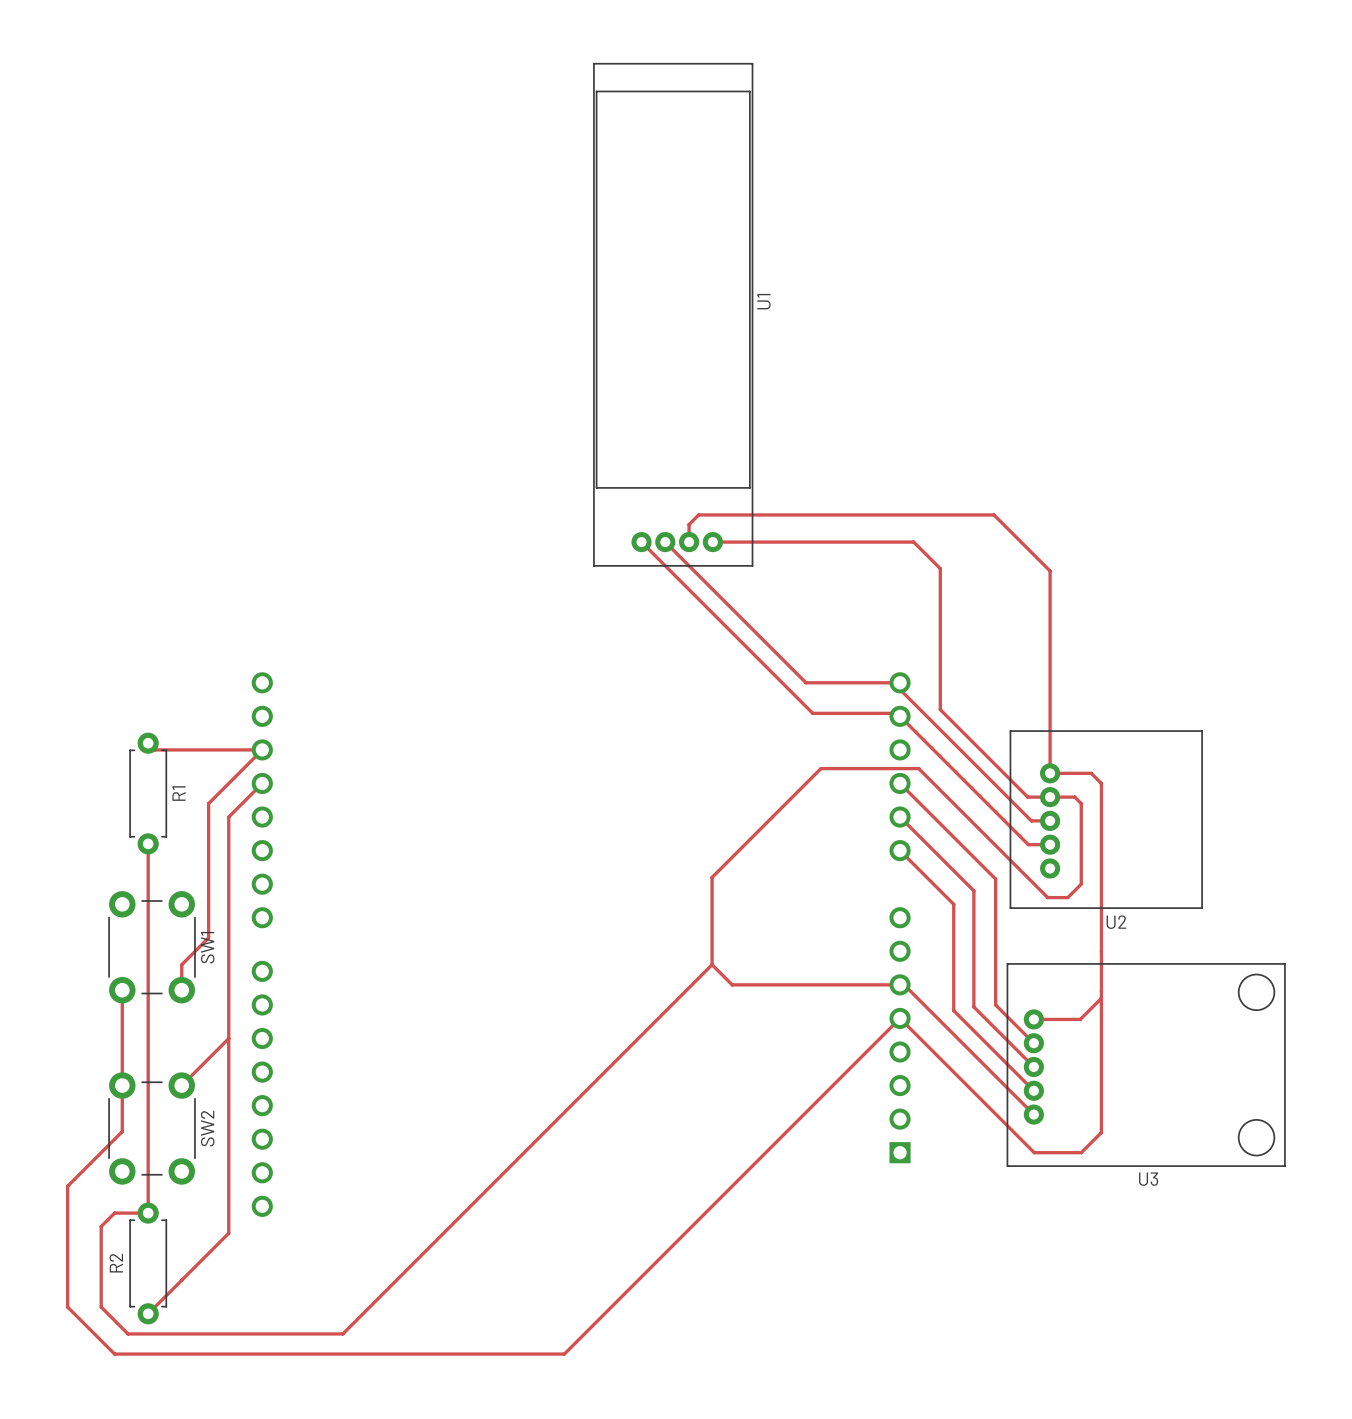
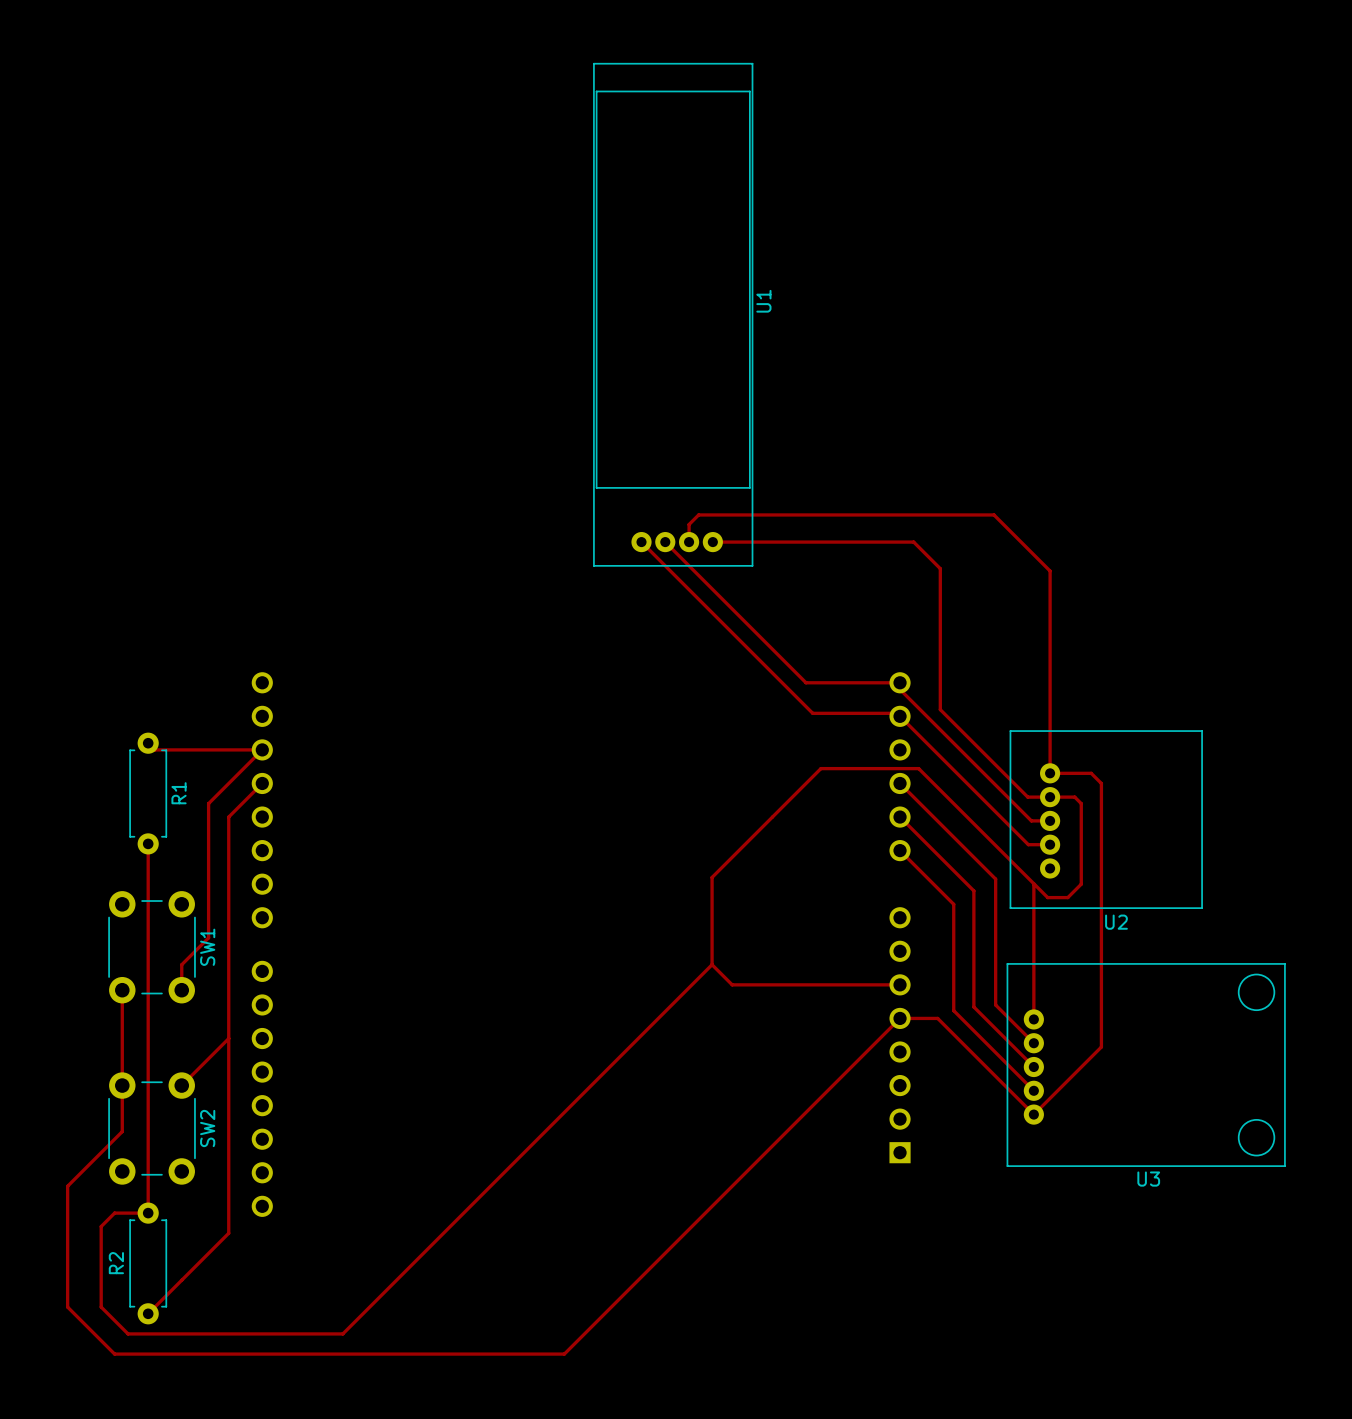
top track: (900, 984) (904, 984) (937, 1018) -> (900, 1018) (937, 1018)
top track: (1101, 998) (1080, 1019) (1033, 1019) -> (1034, 884) (1033, 1019)
top track: (900, 1018) (1034, 1152) (1081, 1152) (1101, 1132) (1101, 1047) -> (1033, 1114) (1101, 1047)

